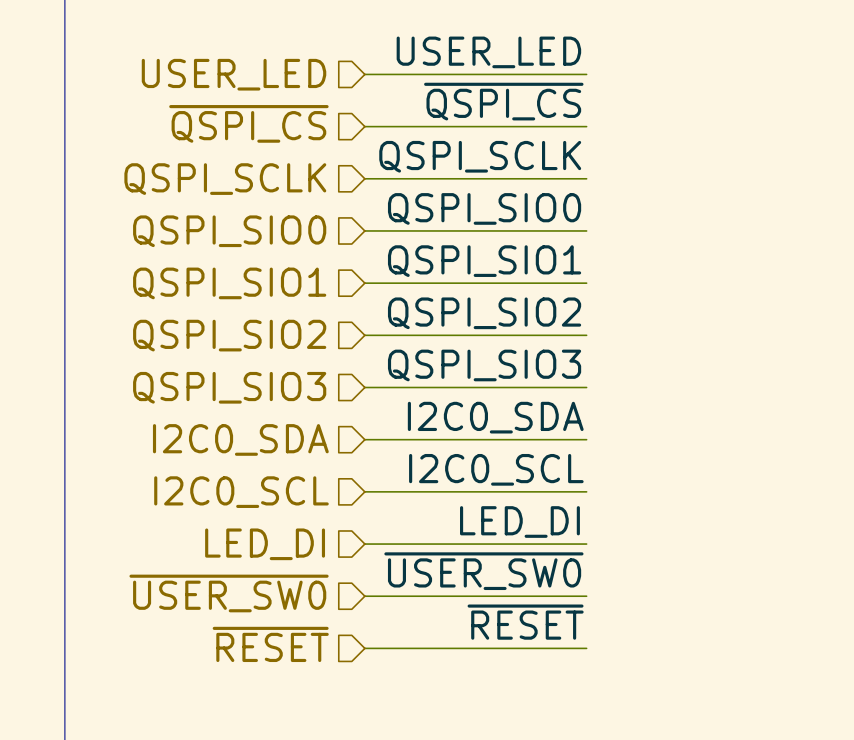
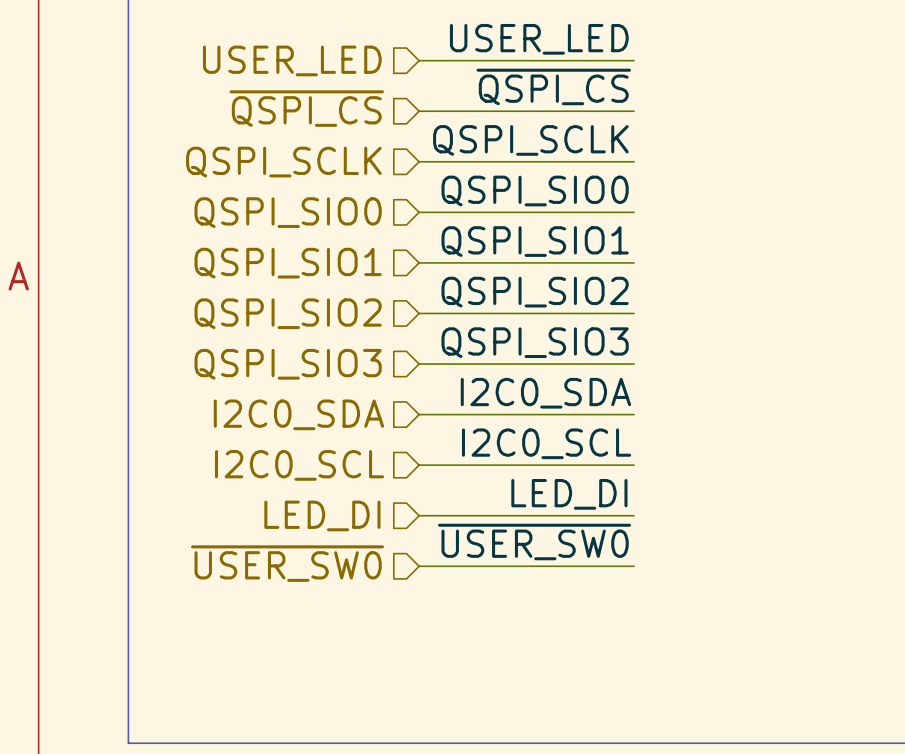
label: ~{RESET} (525, 622) -> none
hierarchical label: ~{RESET} (270, 644) -> none
wire: (364, 648) (586, 648) -> none

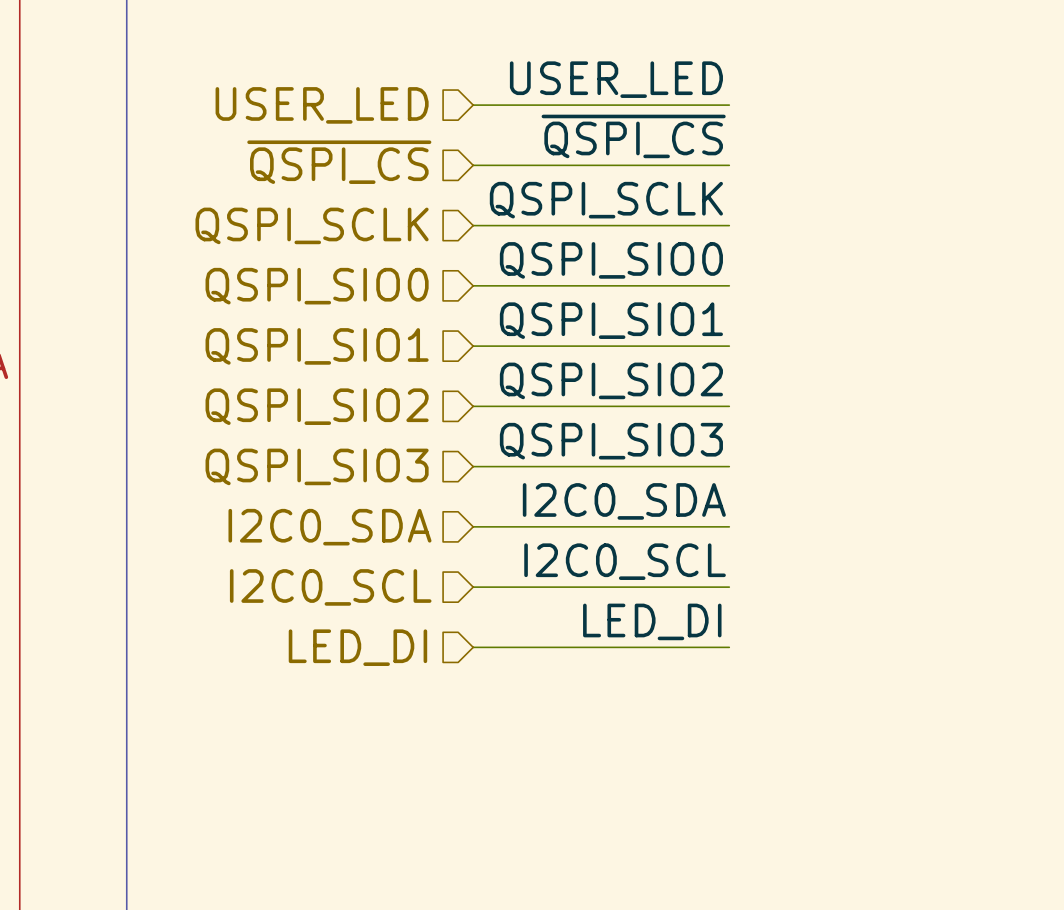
label: ~{USER_SW0} (534, 542) -> none
hierarchical label: ~{USER_SW0} (287, 563) -> none
wire: (419, 566) (633, 566) -> none

